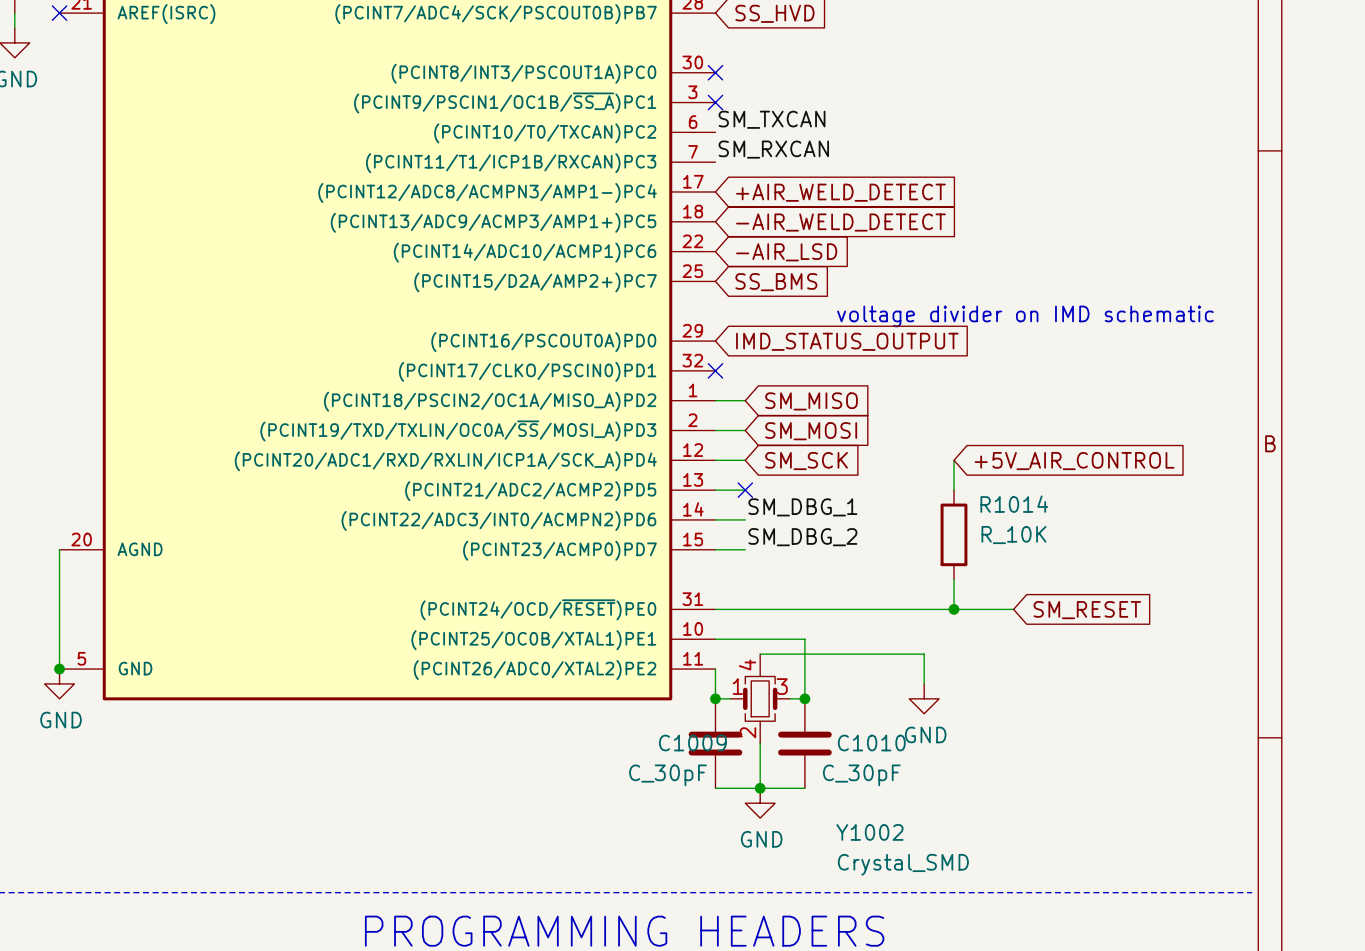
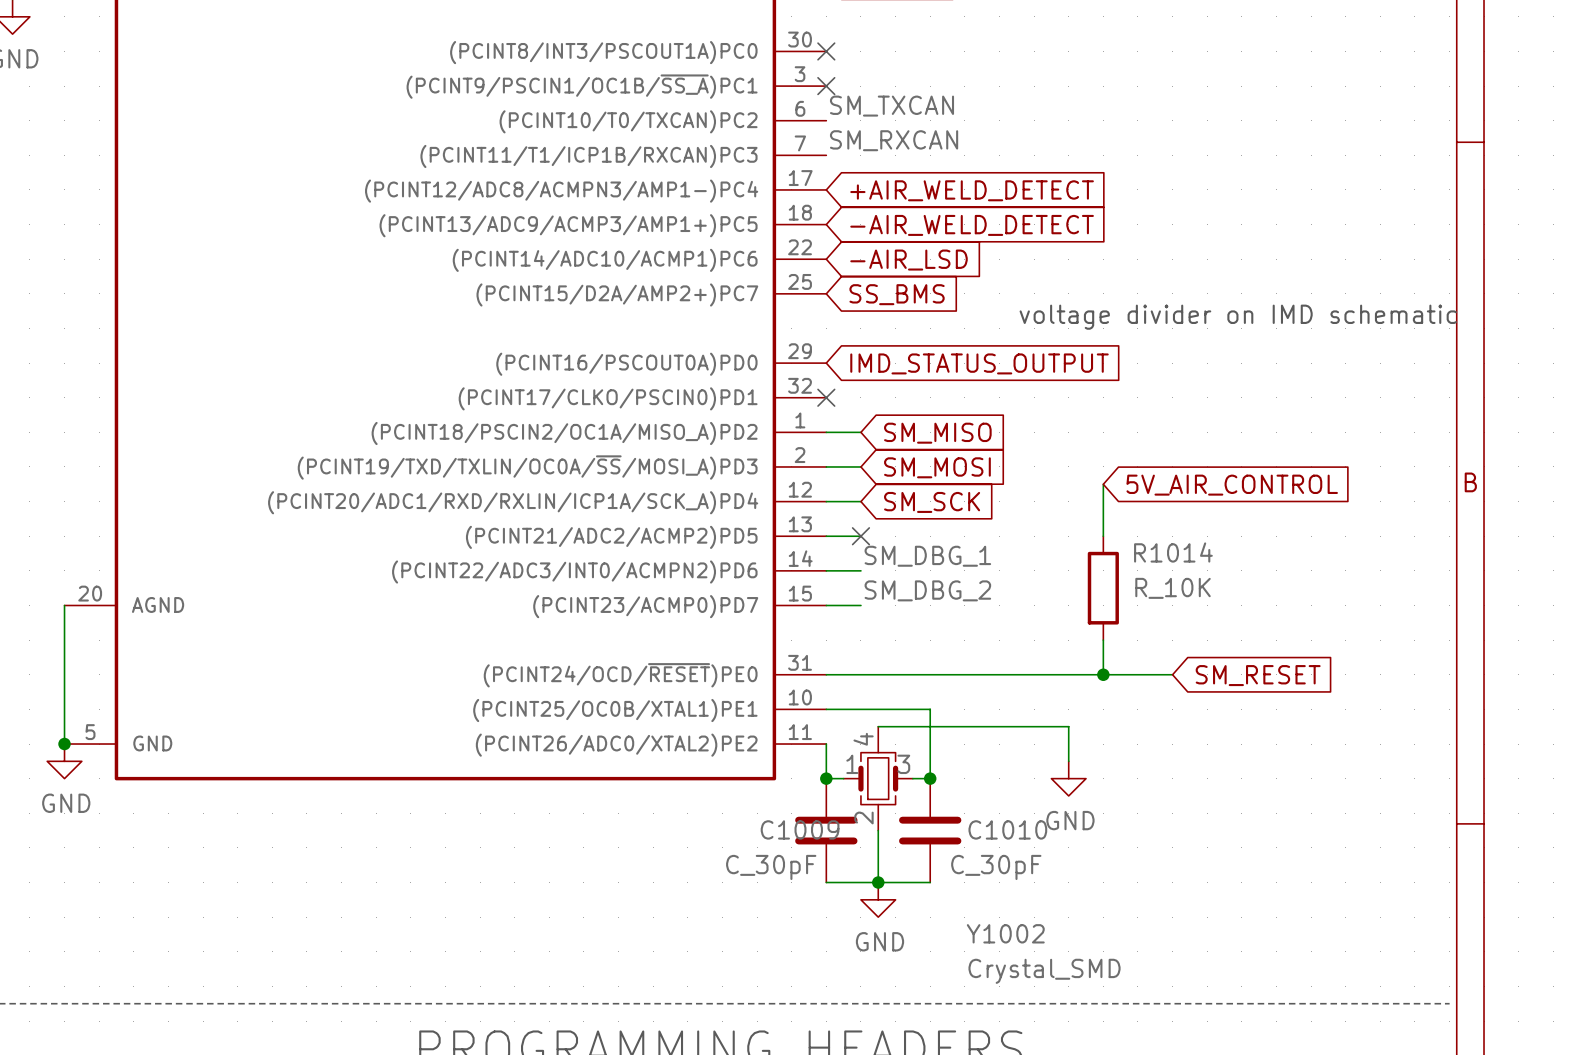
text position: voltage divider on IMD schematic (1025, 316) -> voltage divider on IMD schematic (1238, 317)
wire: none -> (1103, 484) (1103, 501)
global label: +5V_AIR_CONTROL (1074, 461) -> 5V_AIR_CONTROL (1232, 485)

